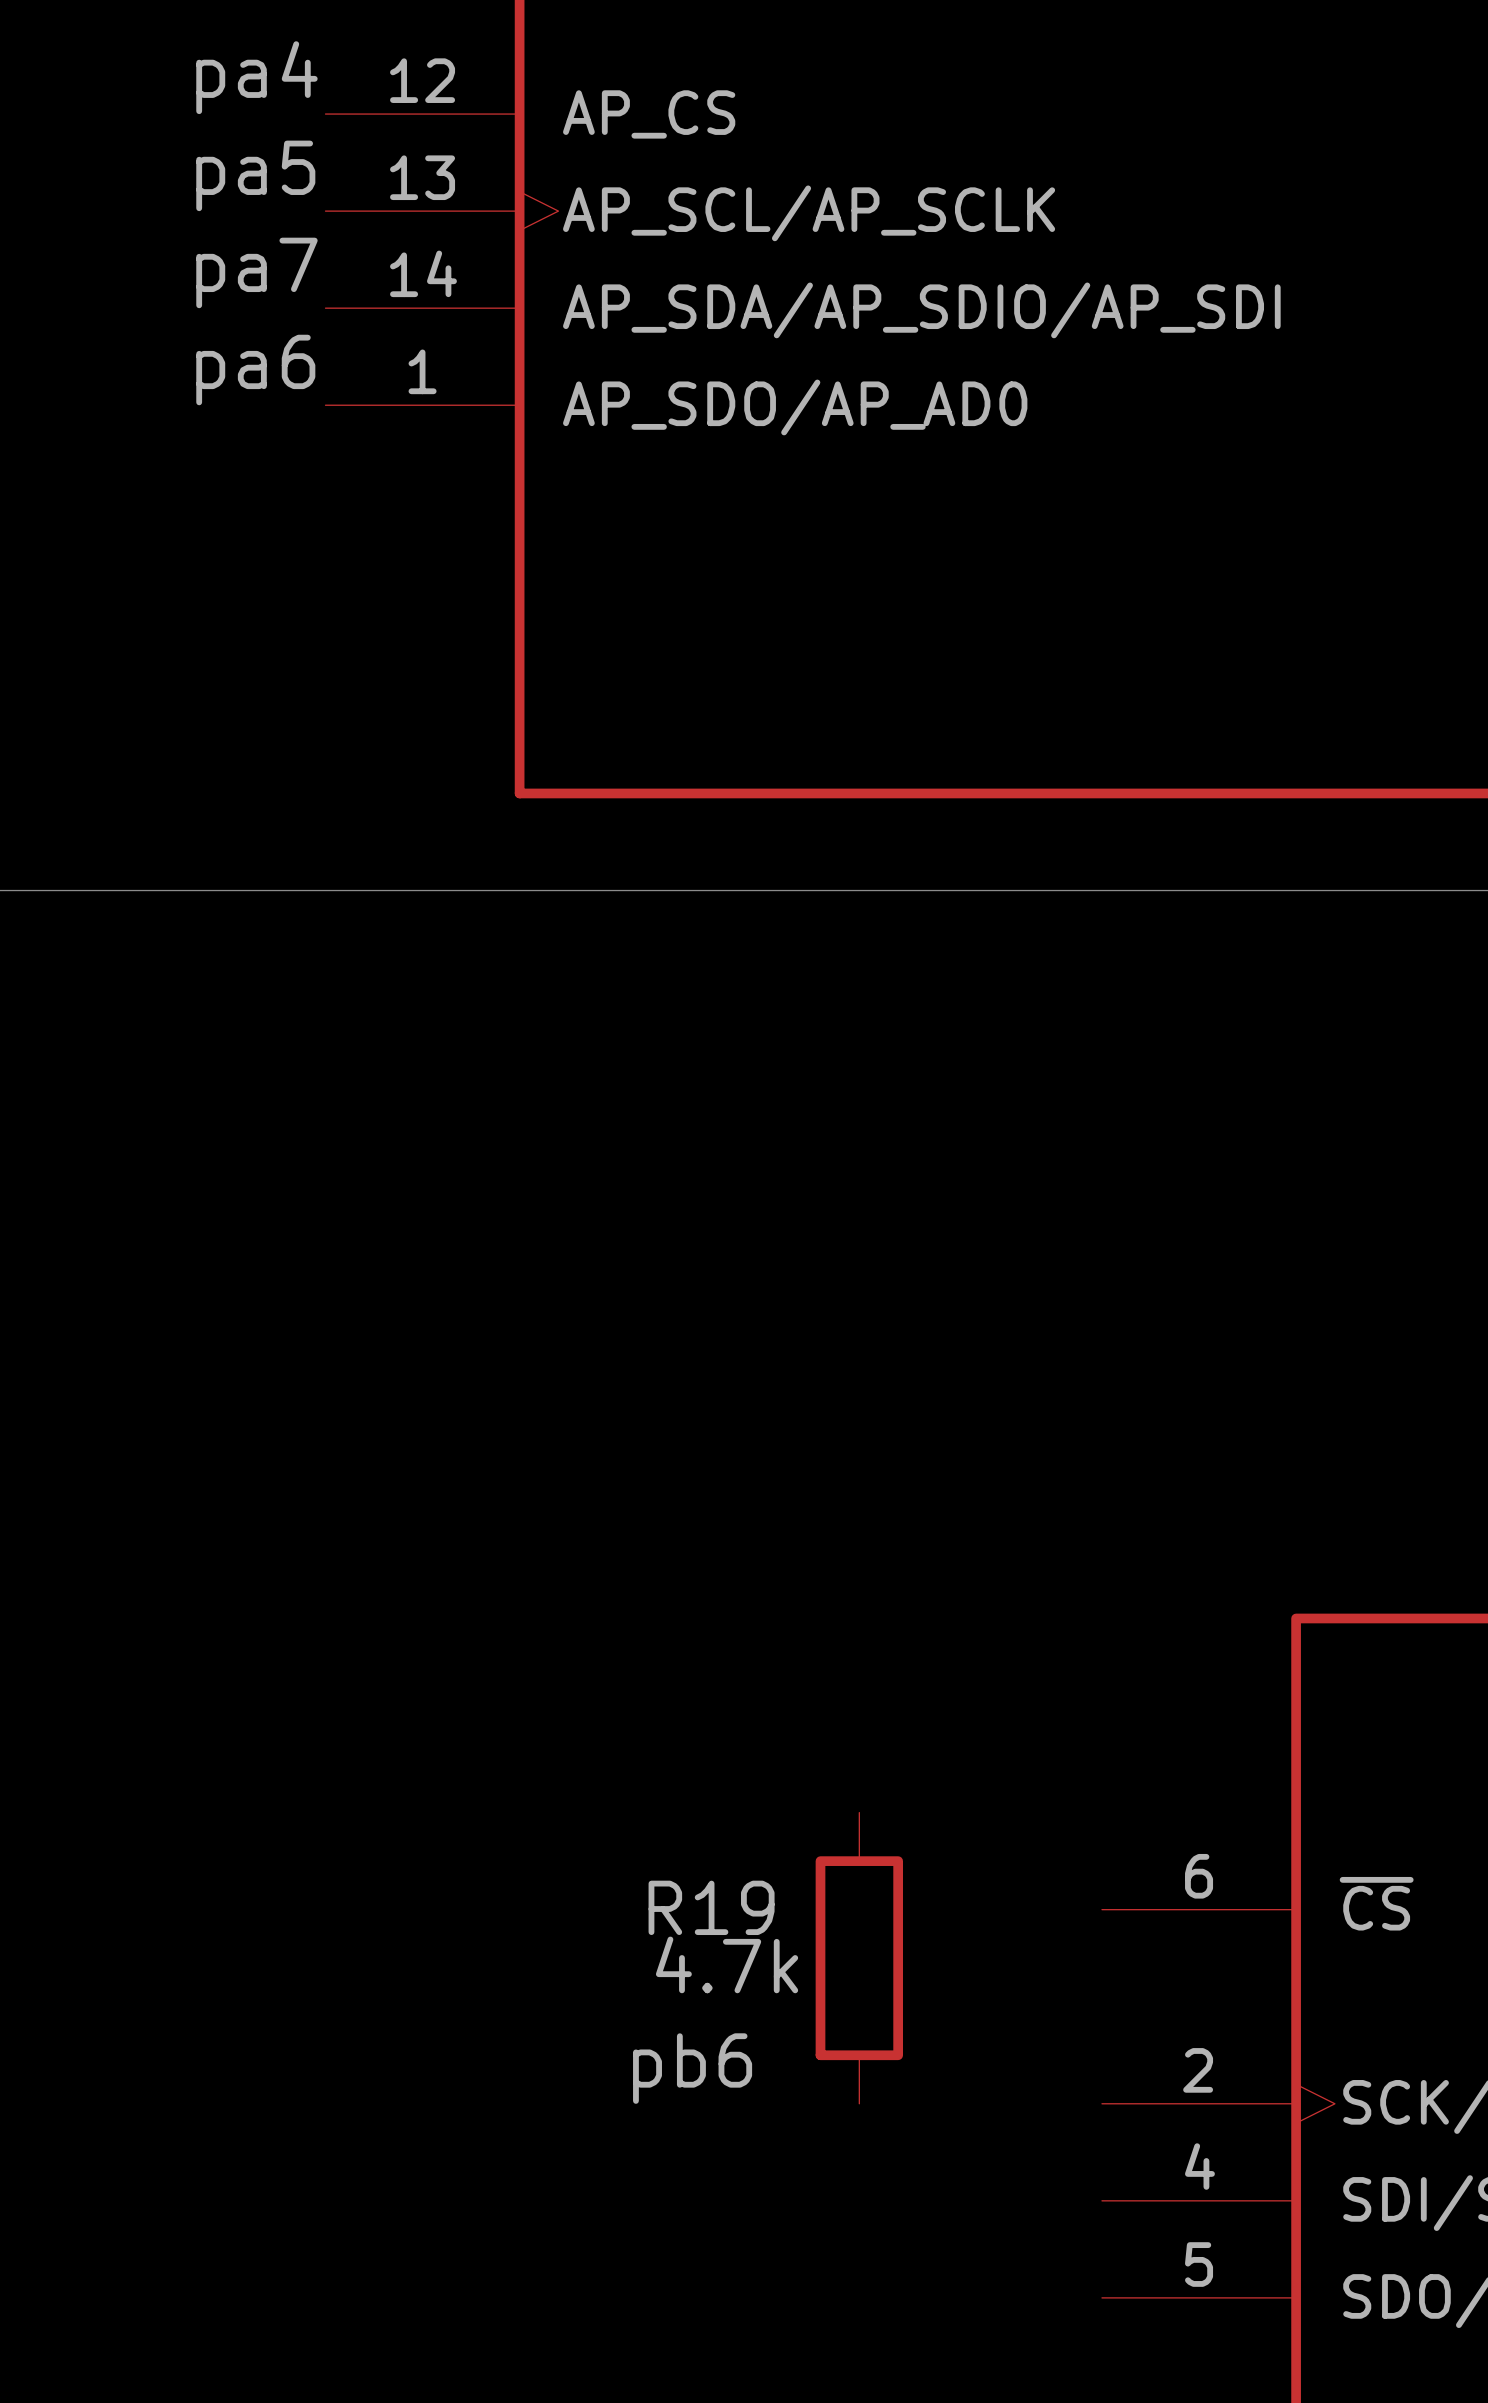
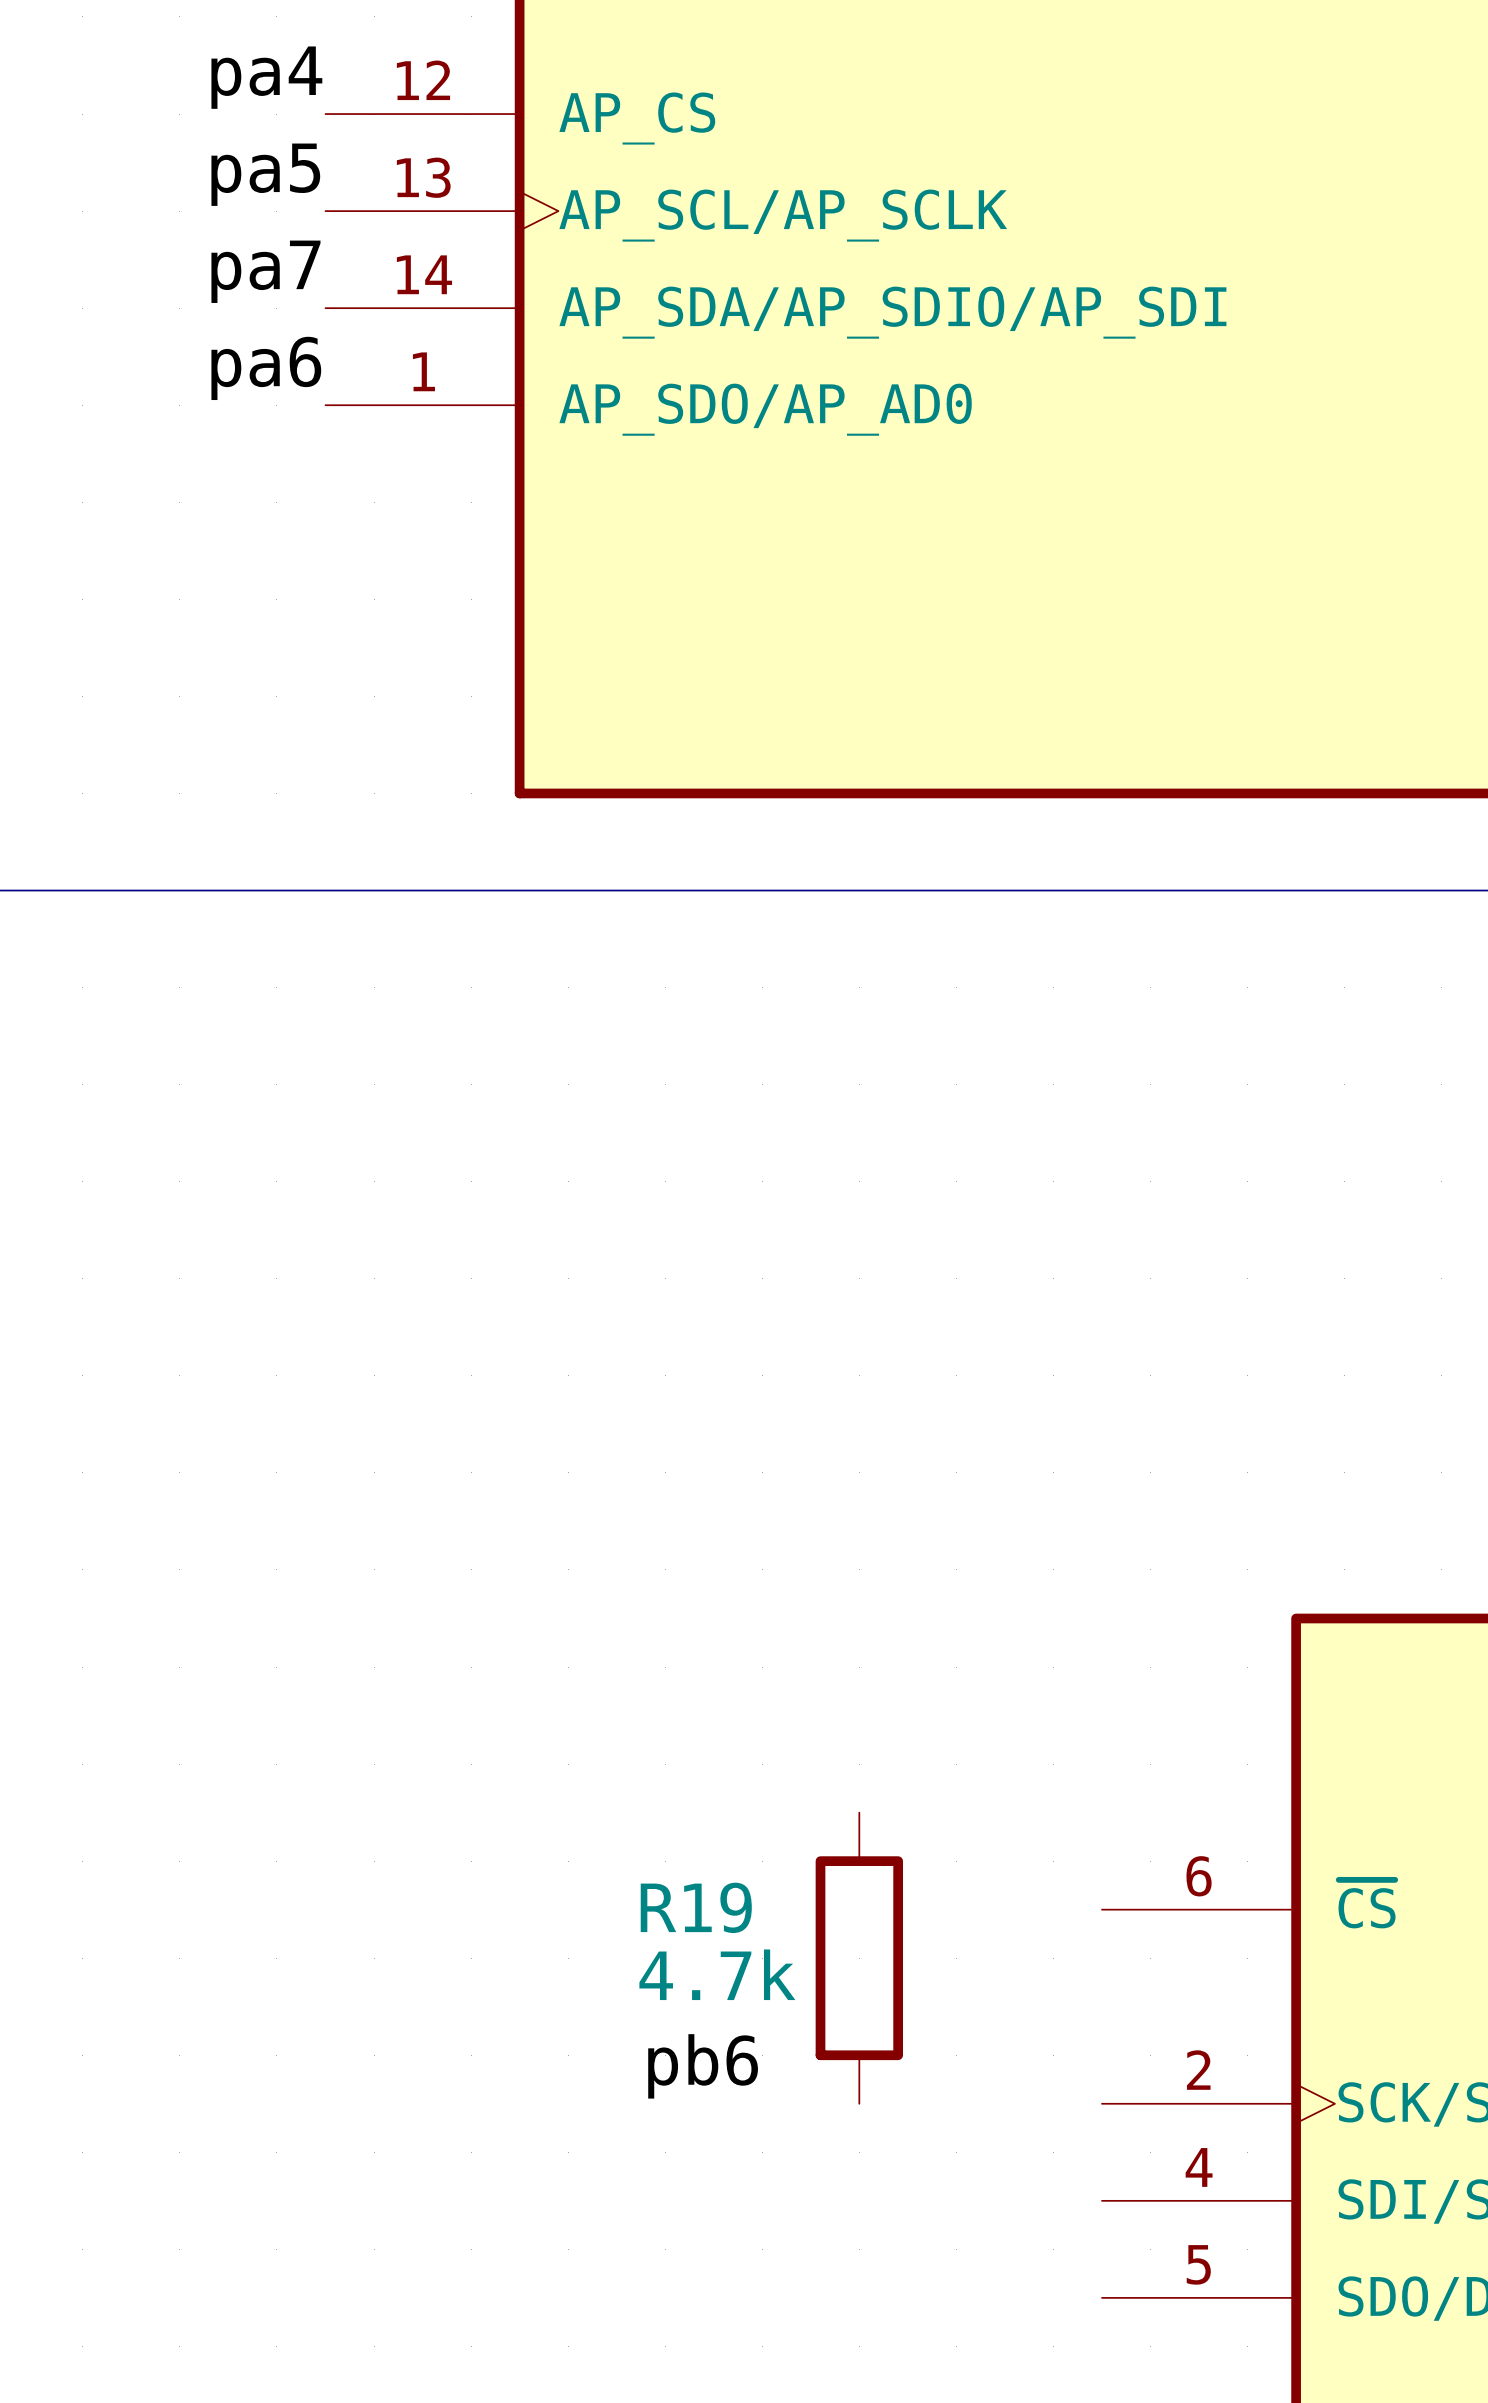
R19 value position: 4.7k (727, 1964) -> 4.7k (717, 1974)

